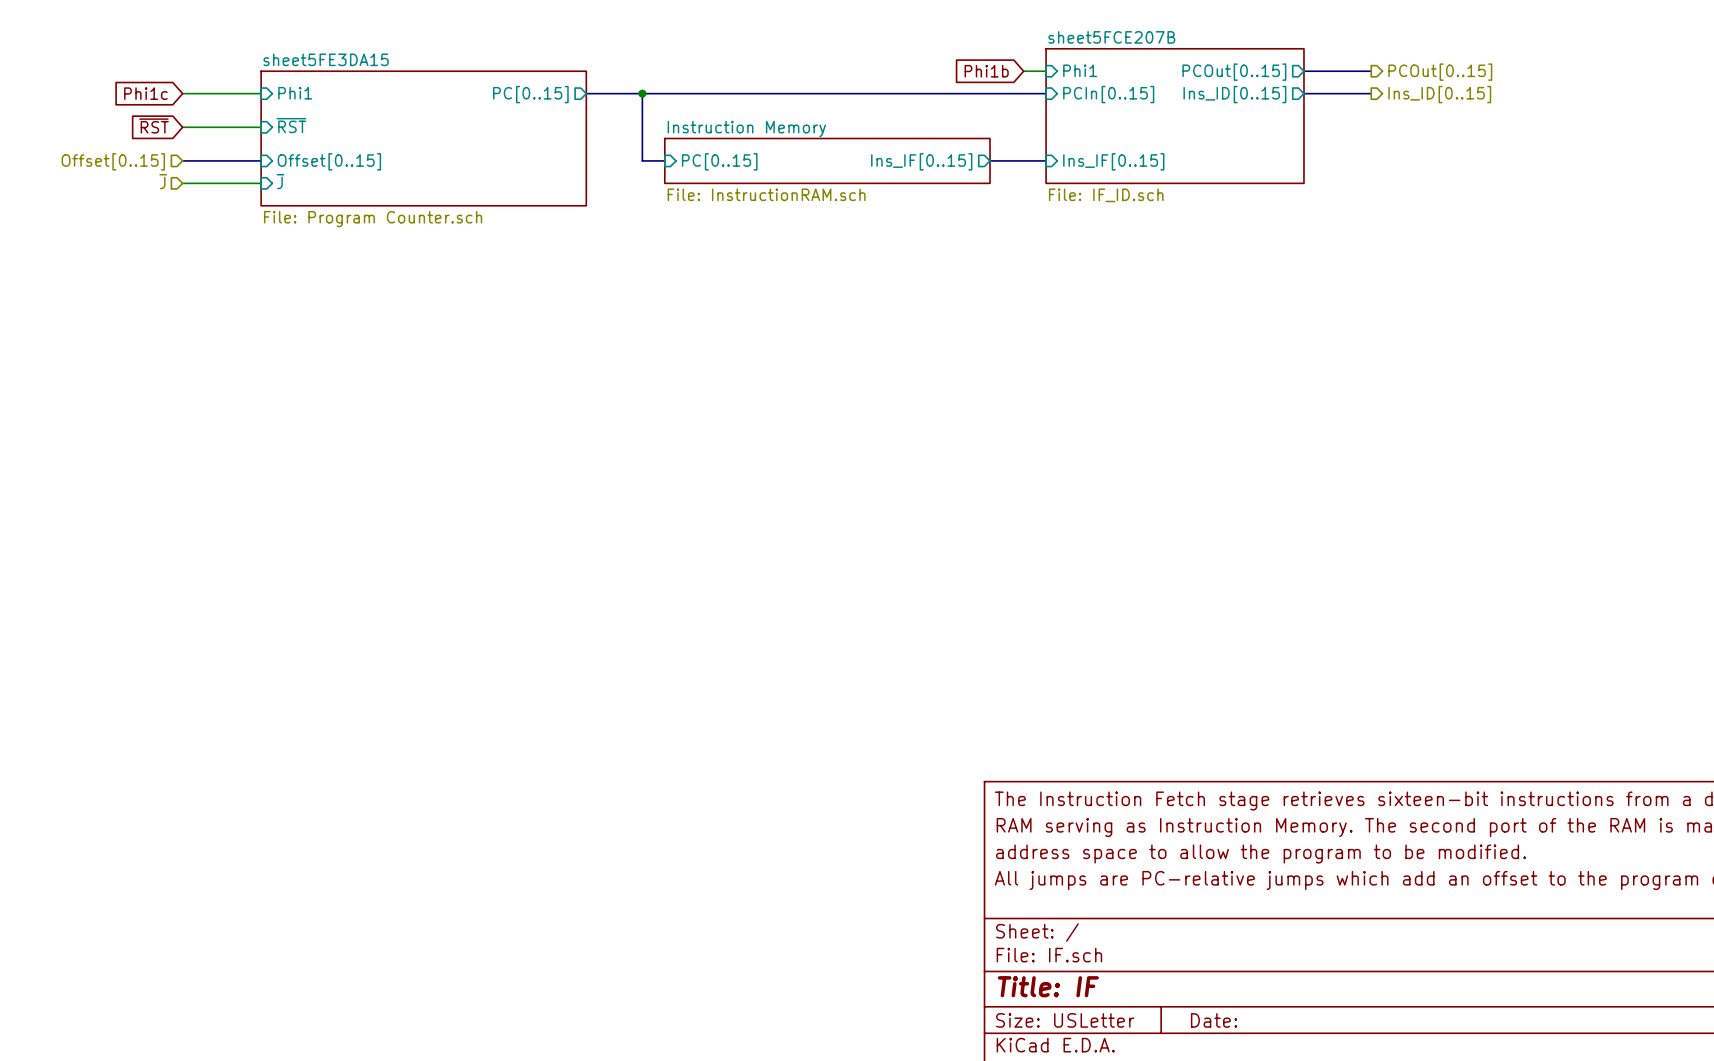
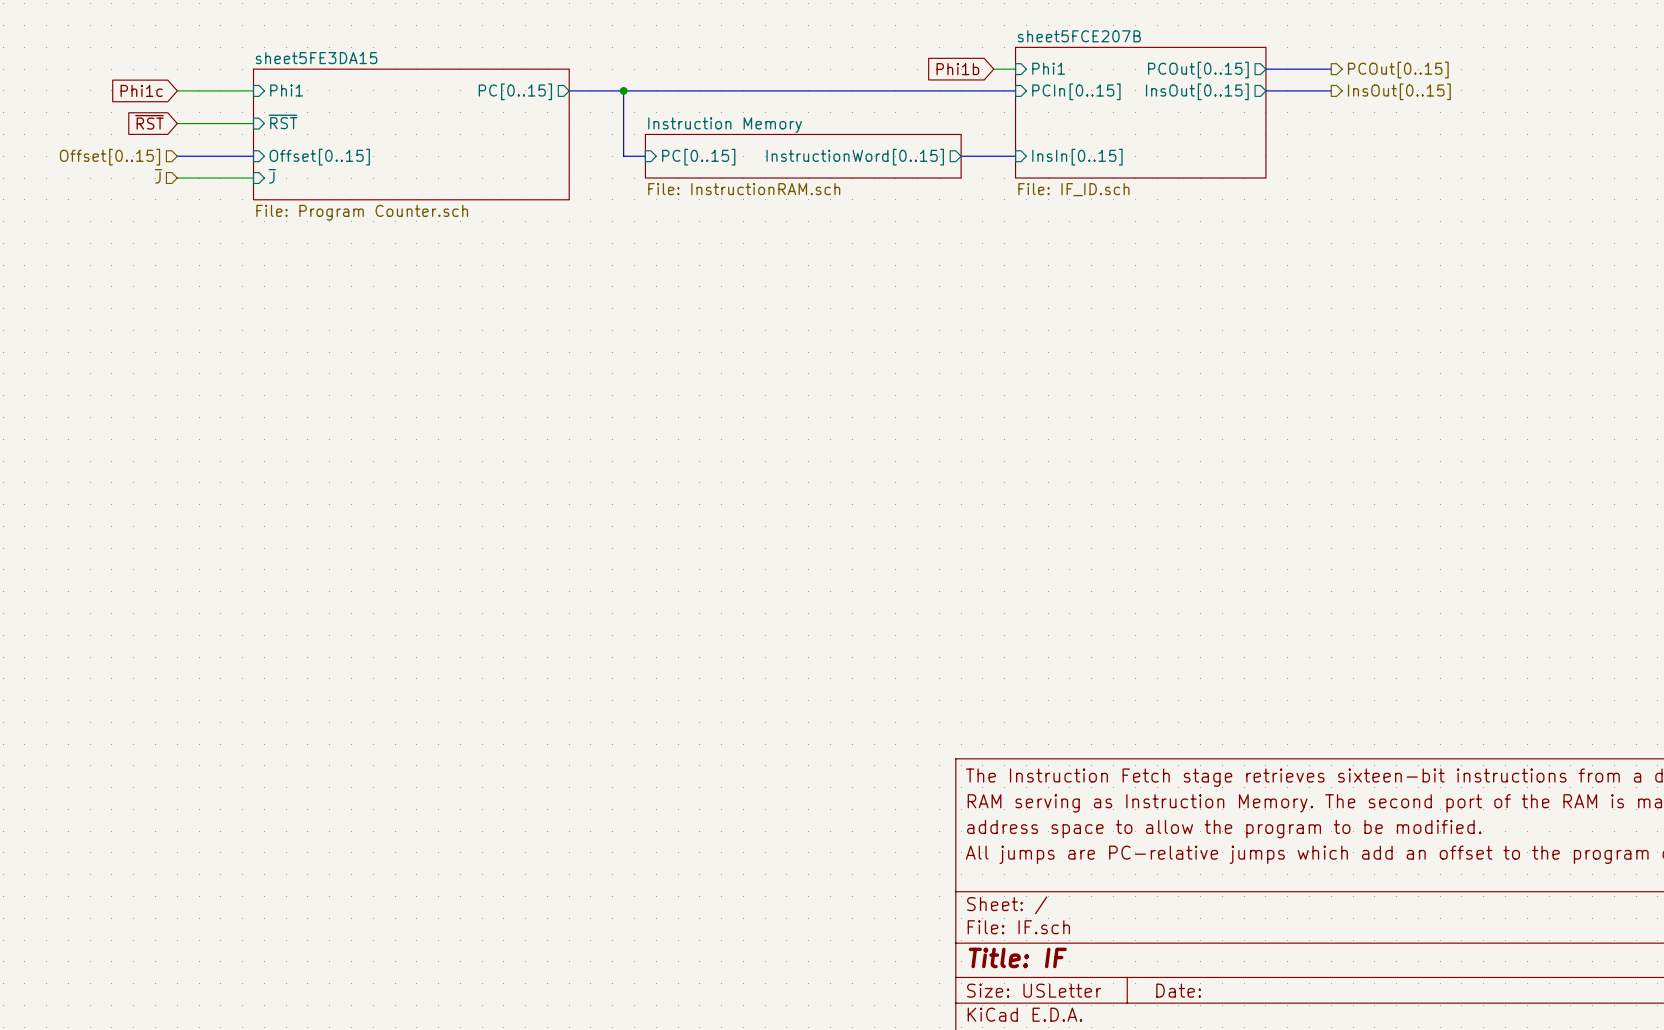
sheet pin: Ins_ID[0..15] (1234, 94) -> InsOut[0..15] (1197, 91)
hierarchical label: Ins_ID[0..15] (1439, 94) -> InsOut[0..15] (1399, 91)
sheet pin: Ins_IF[0..15] (921, 161) -> InstructionWord[0..15] (855, 157)
sheet pin: Ins_IF[0..15] (1113, 161) -> InsIn[0..15] (1077, 157)

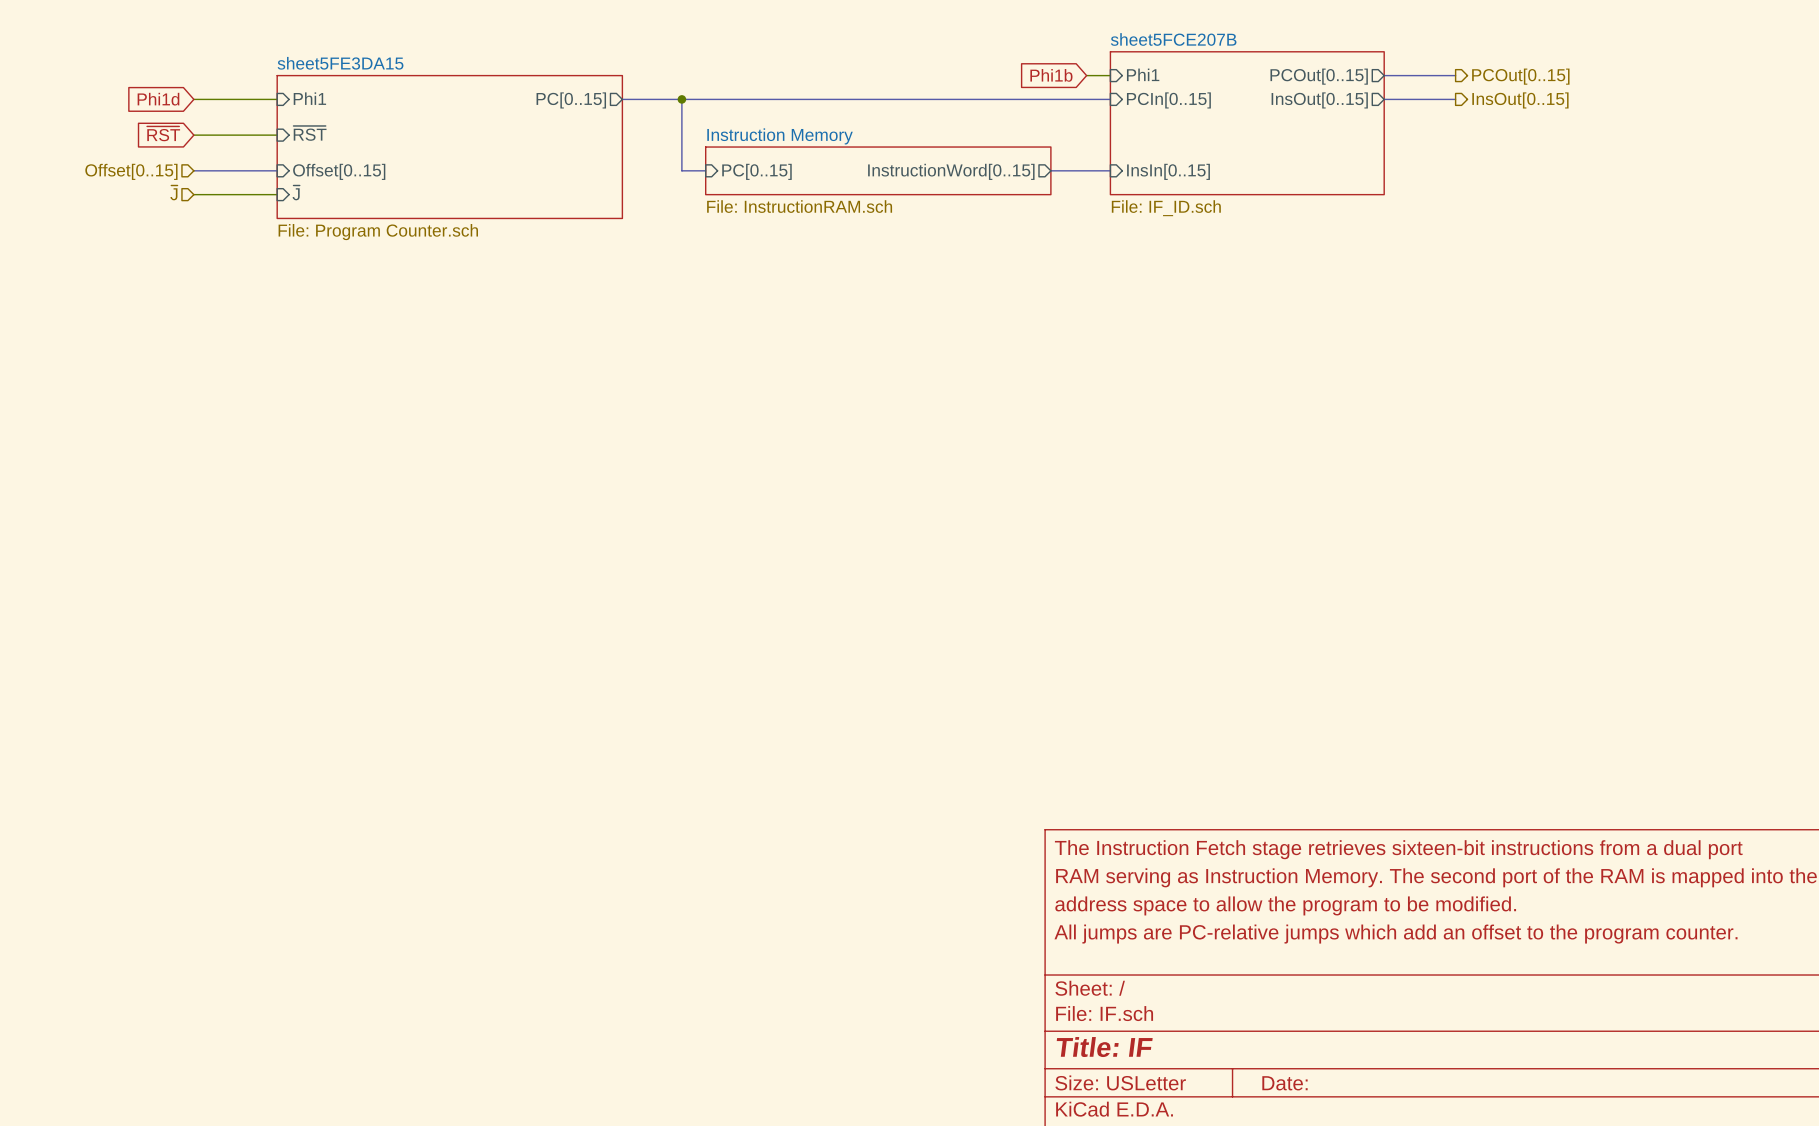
global label: Phi1c (141, 90) -> Phi1d (158, 99)

